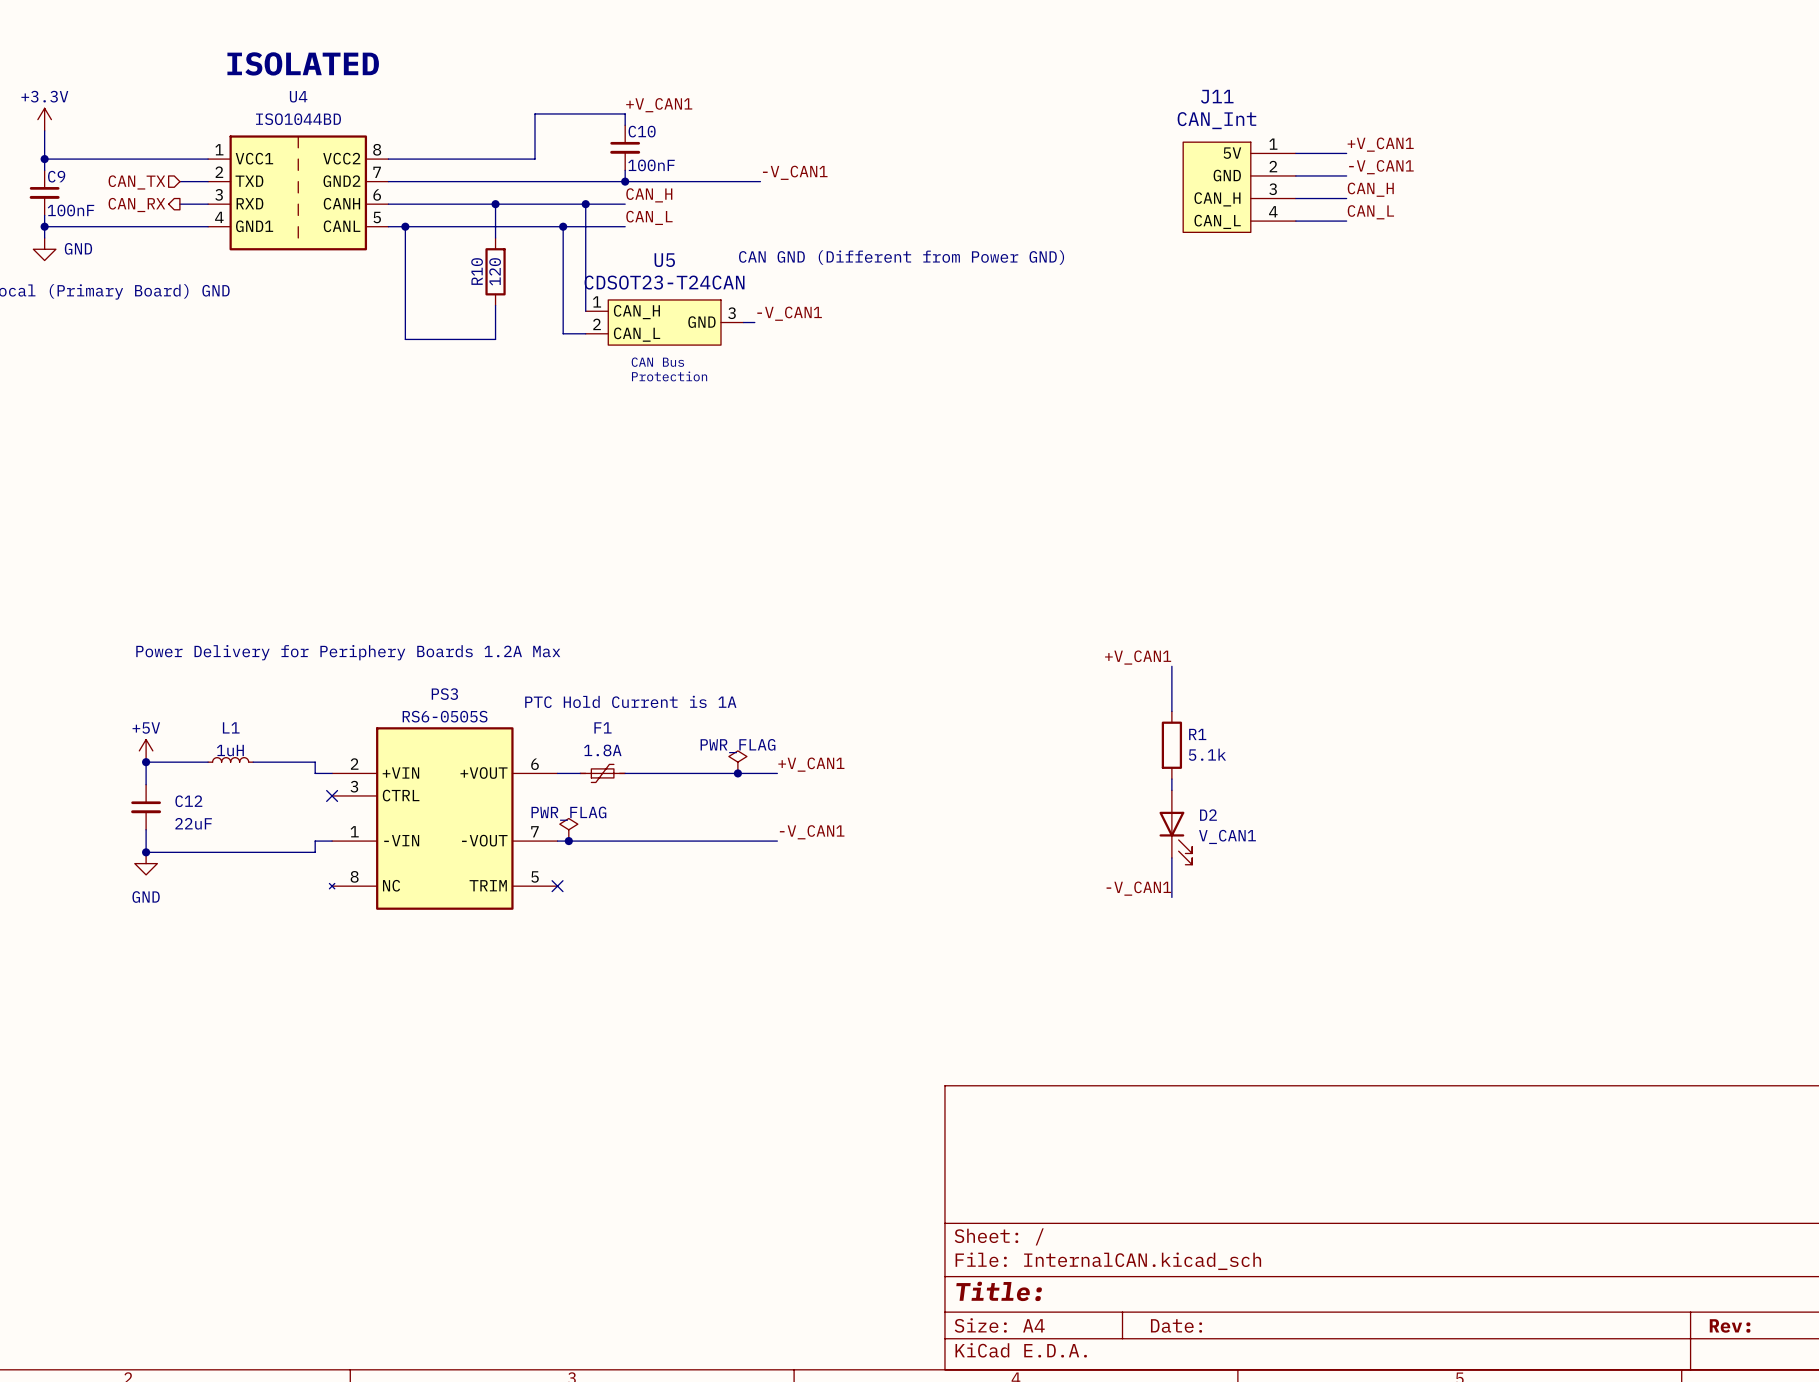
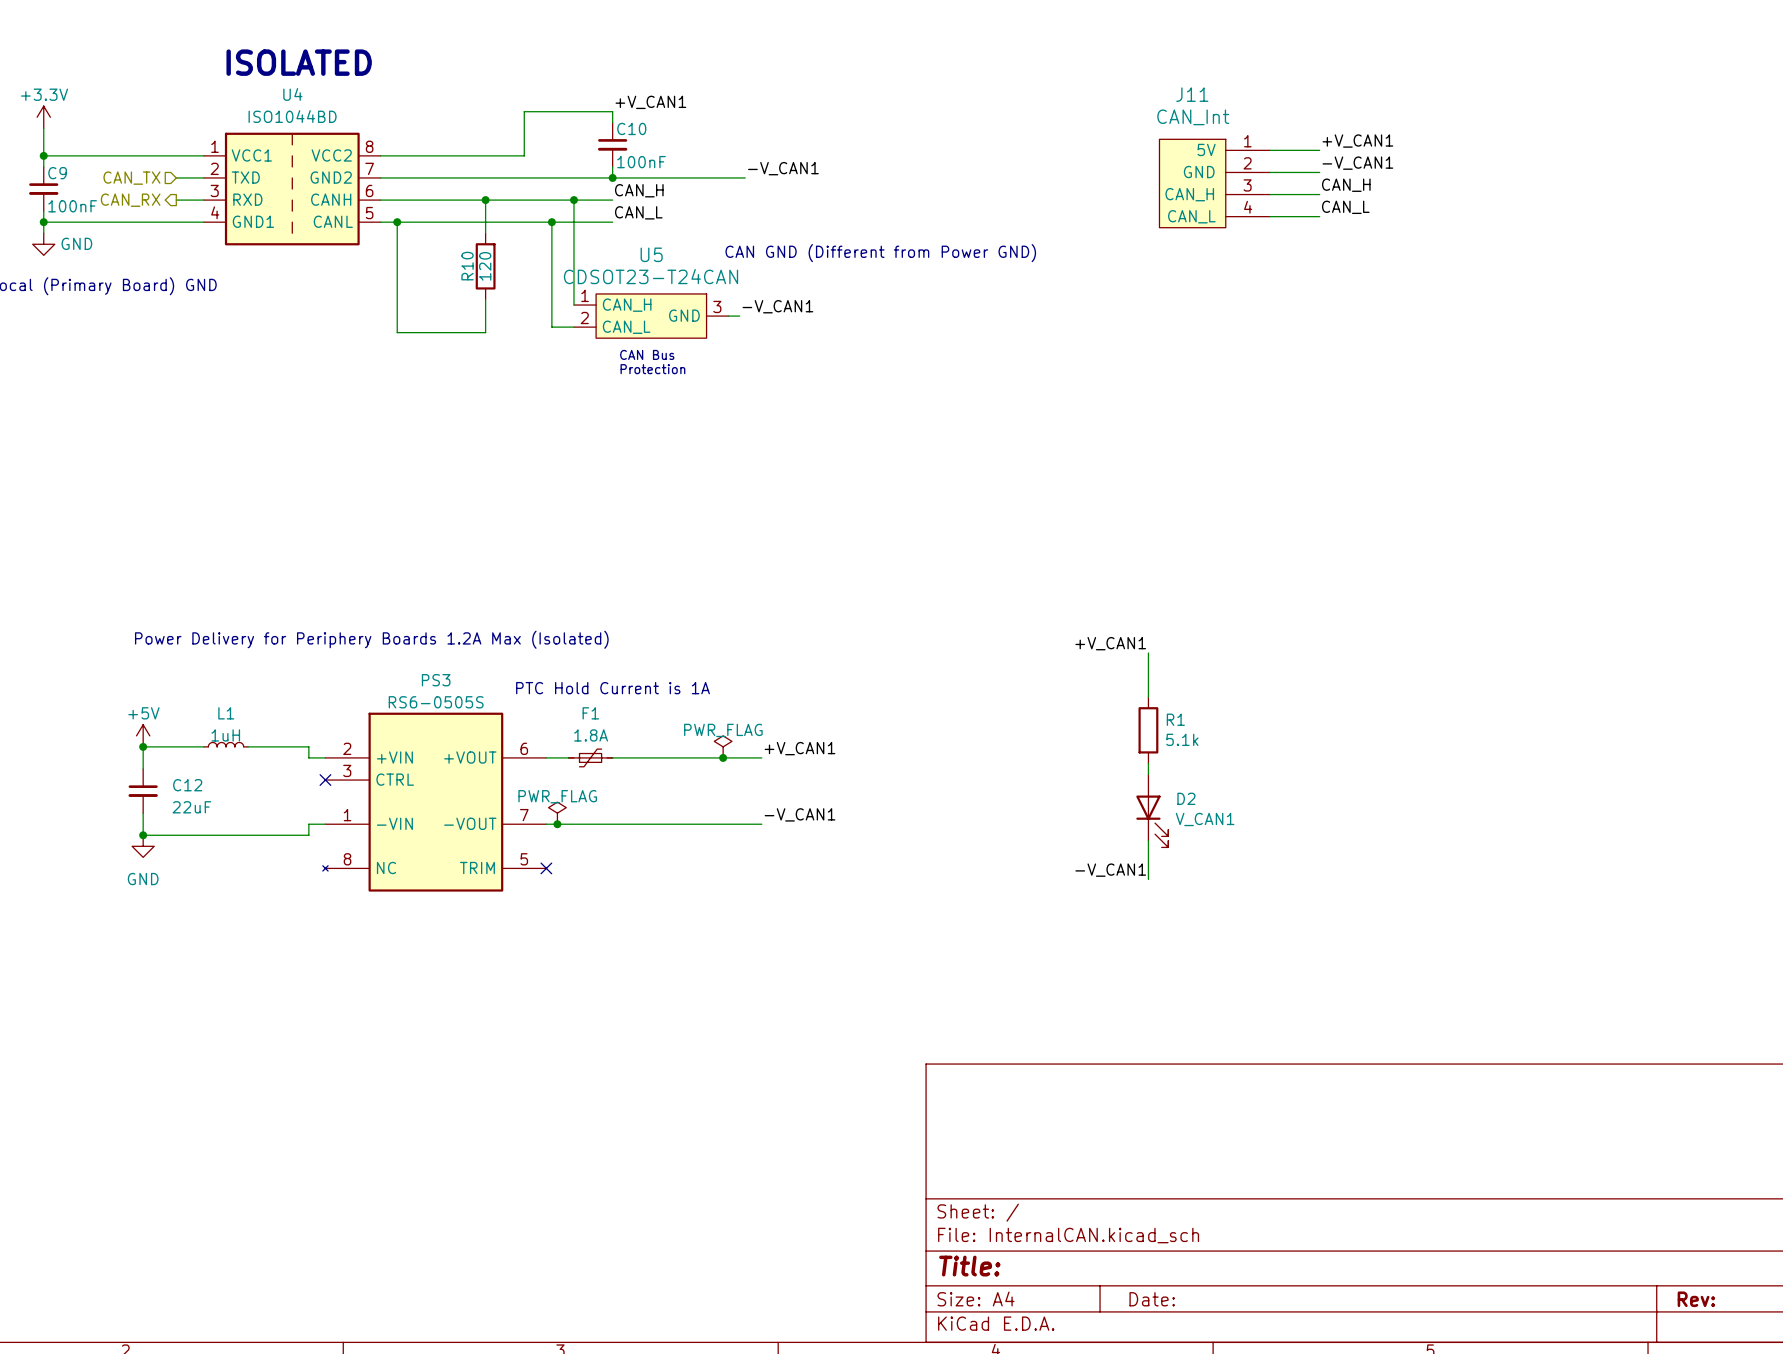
text: Power Delivery for Periphery Boards 1.2A Max (348, 652) -> Power Delivery for Periphery Boards 1.2A Max (Isolated) (371, 639)

